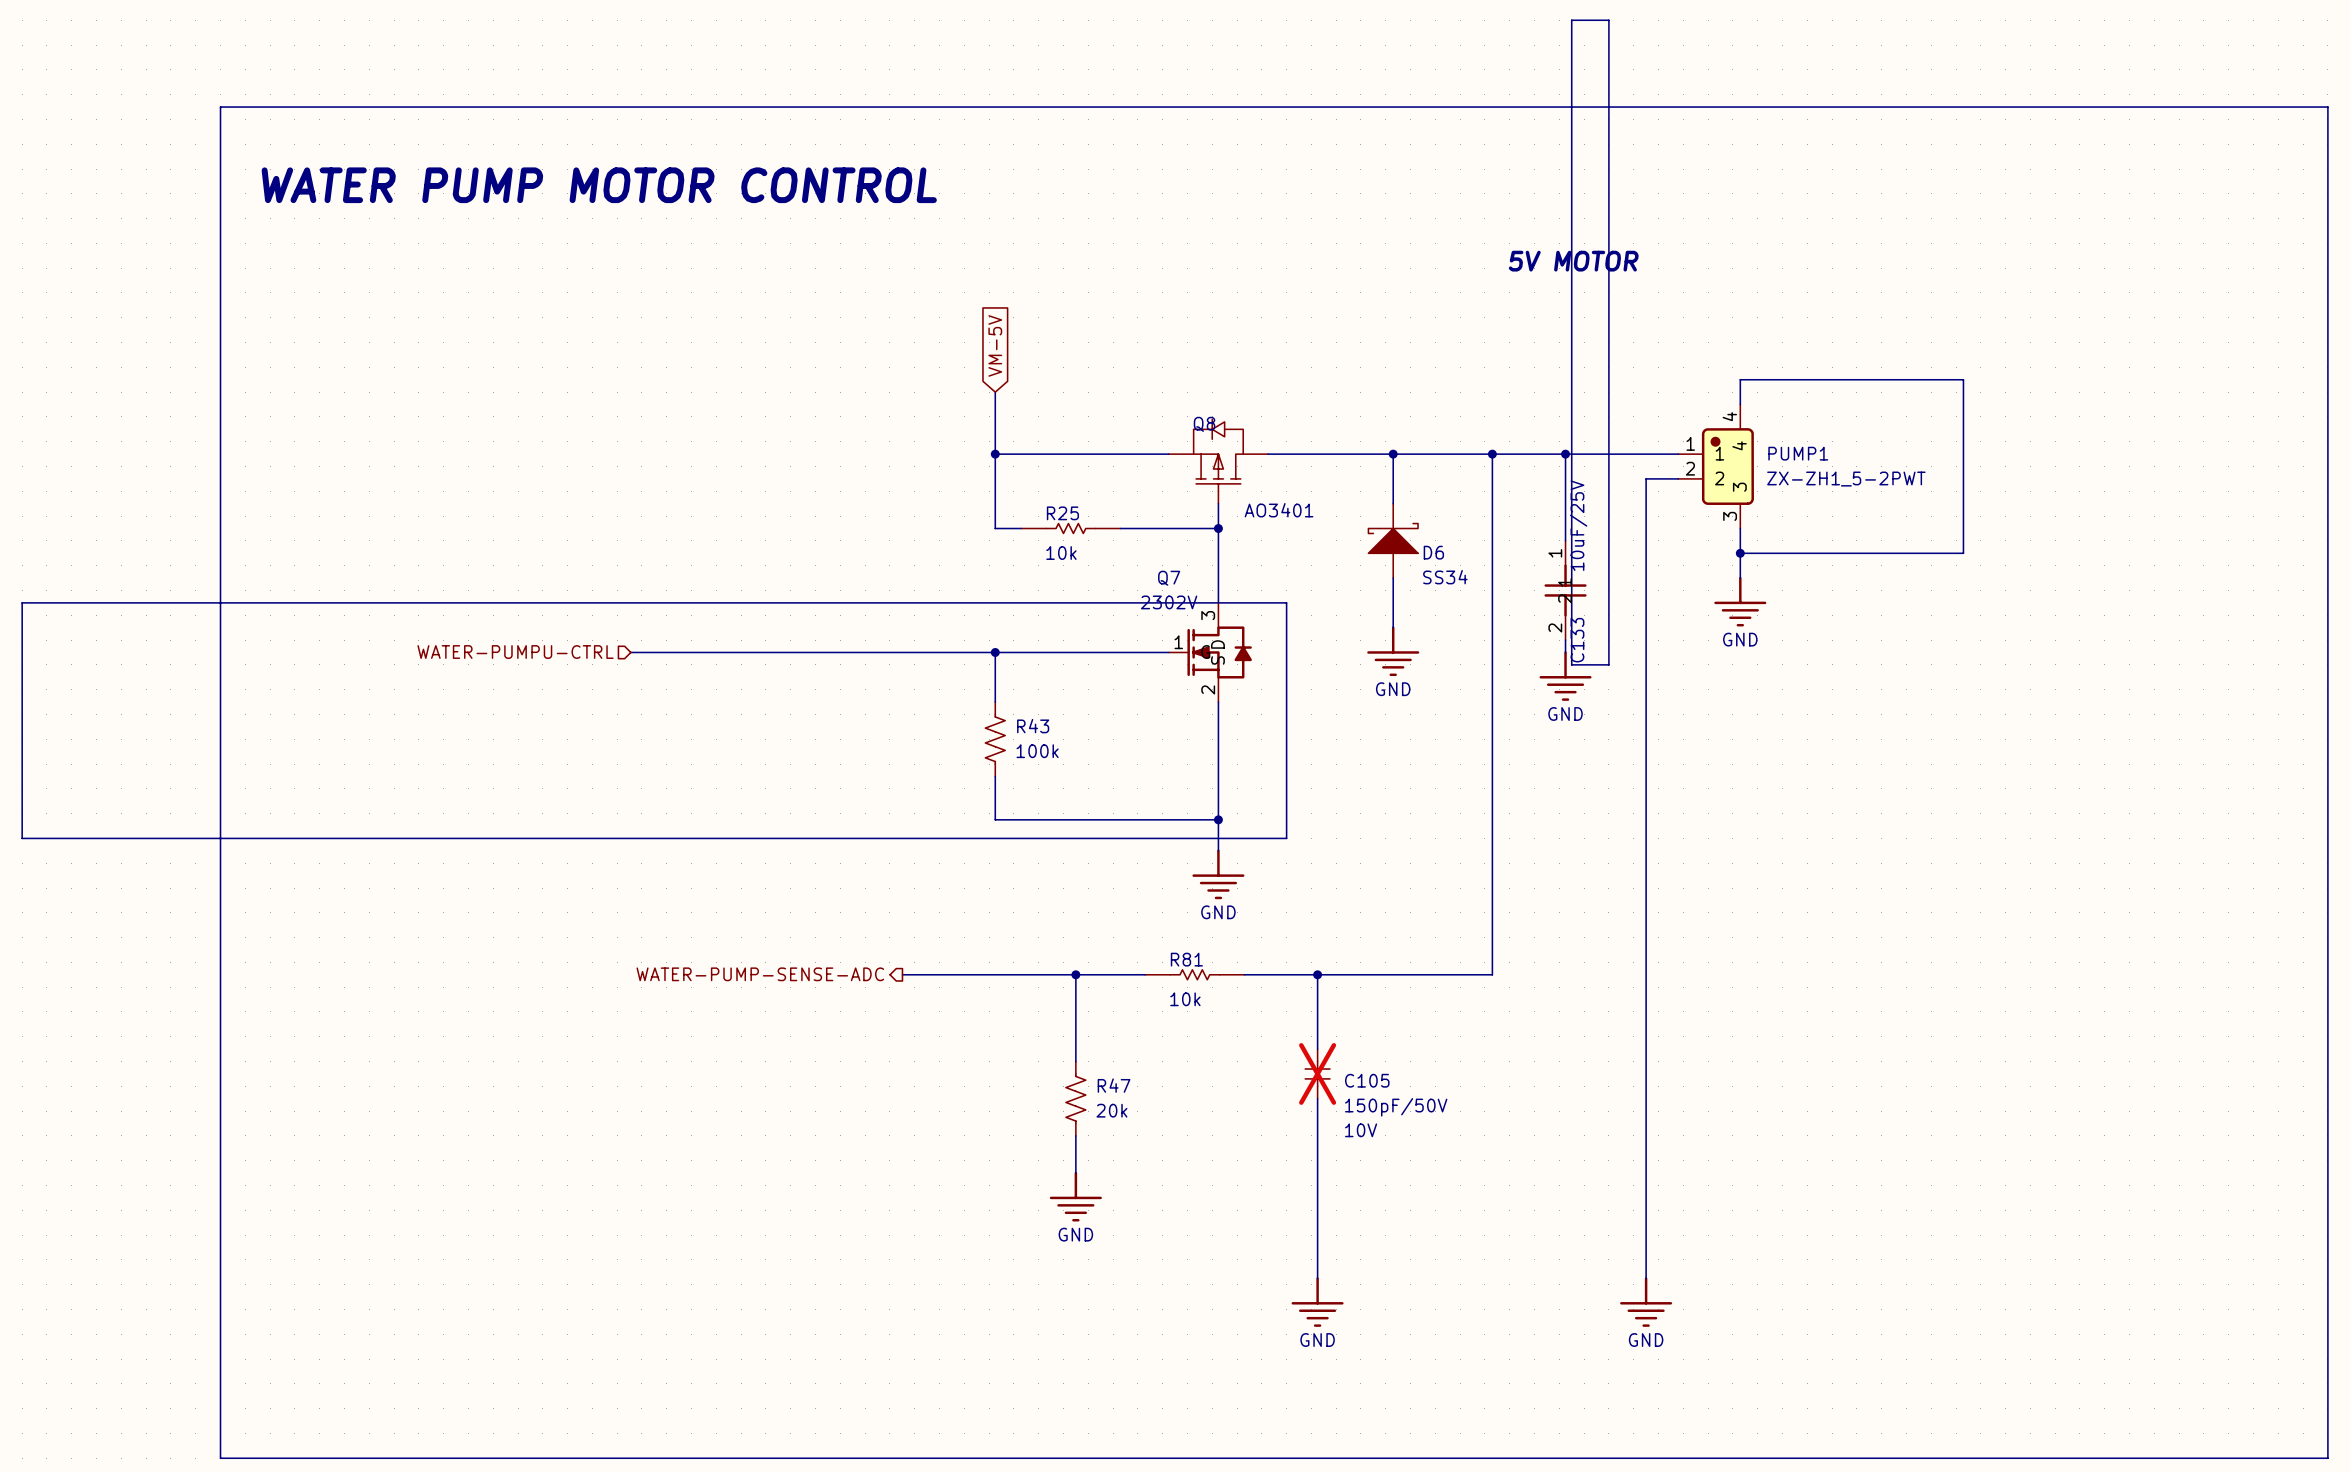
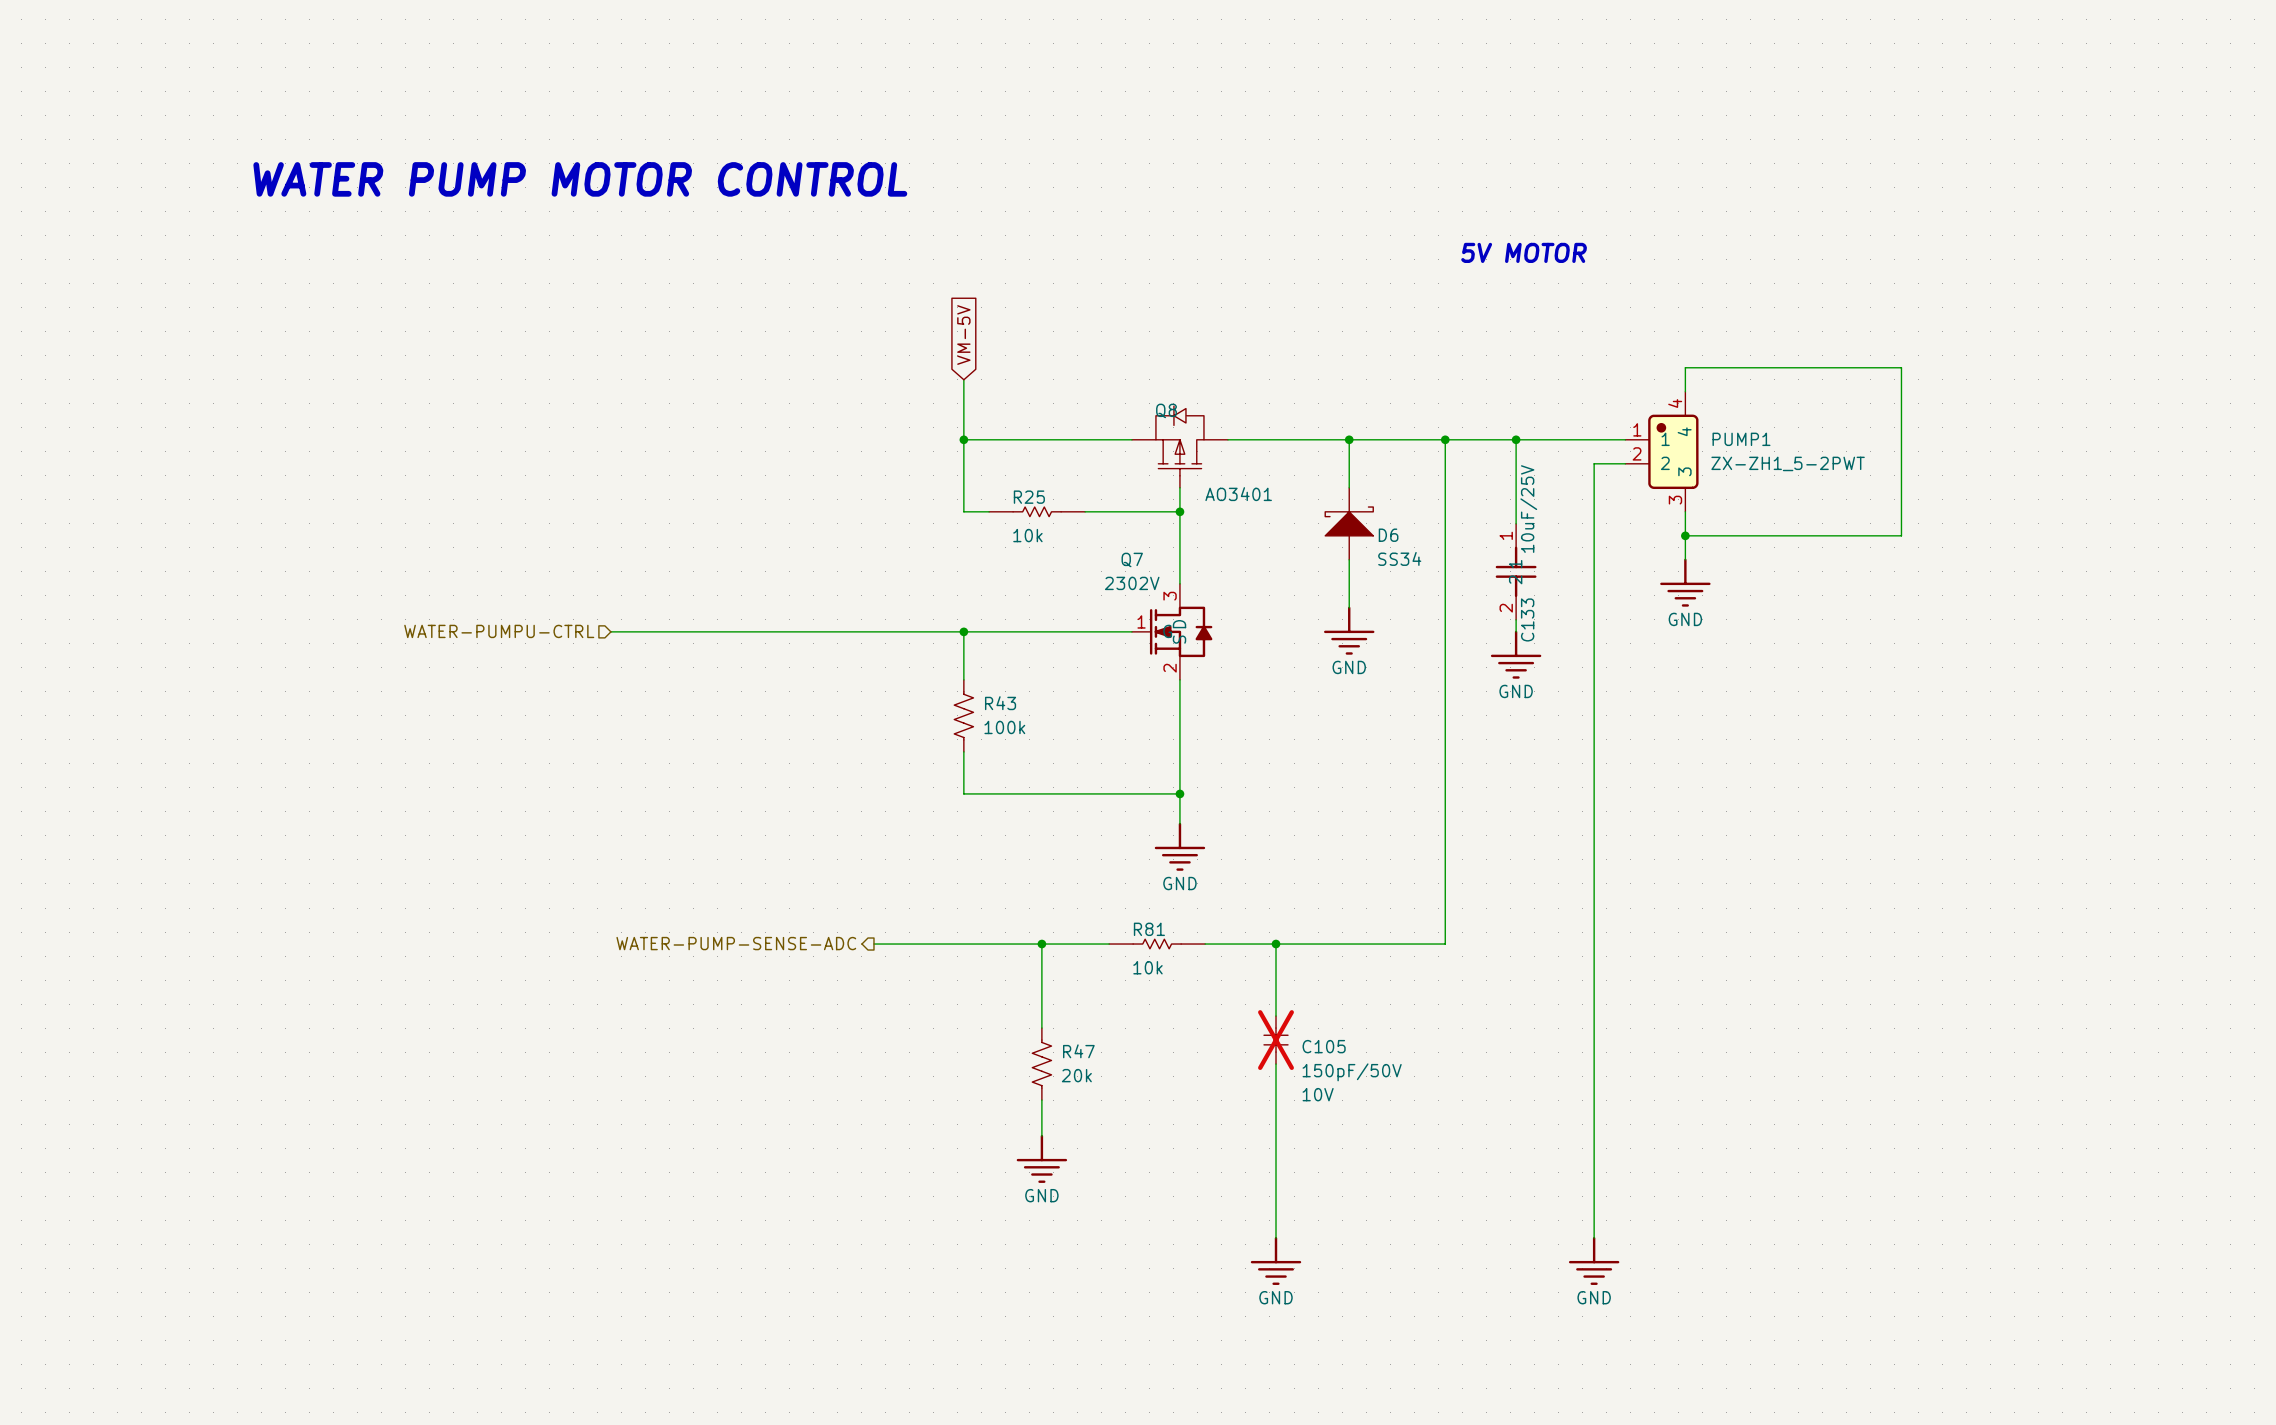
line: (1571, 20) (1608, 20) (1608, 664) (1571, 664) (1571, 20) -> none
line: (220, 107) (2327, 107) (2327, 1458) (220, 1458) (220, 107) -> none
line: (22, 602) (1286, 602) (1286, 838) (22, 838) (22, 602) -> none

